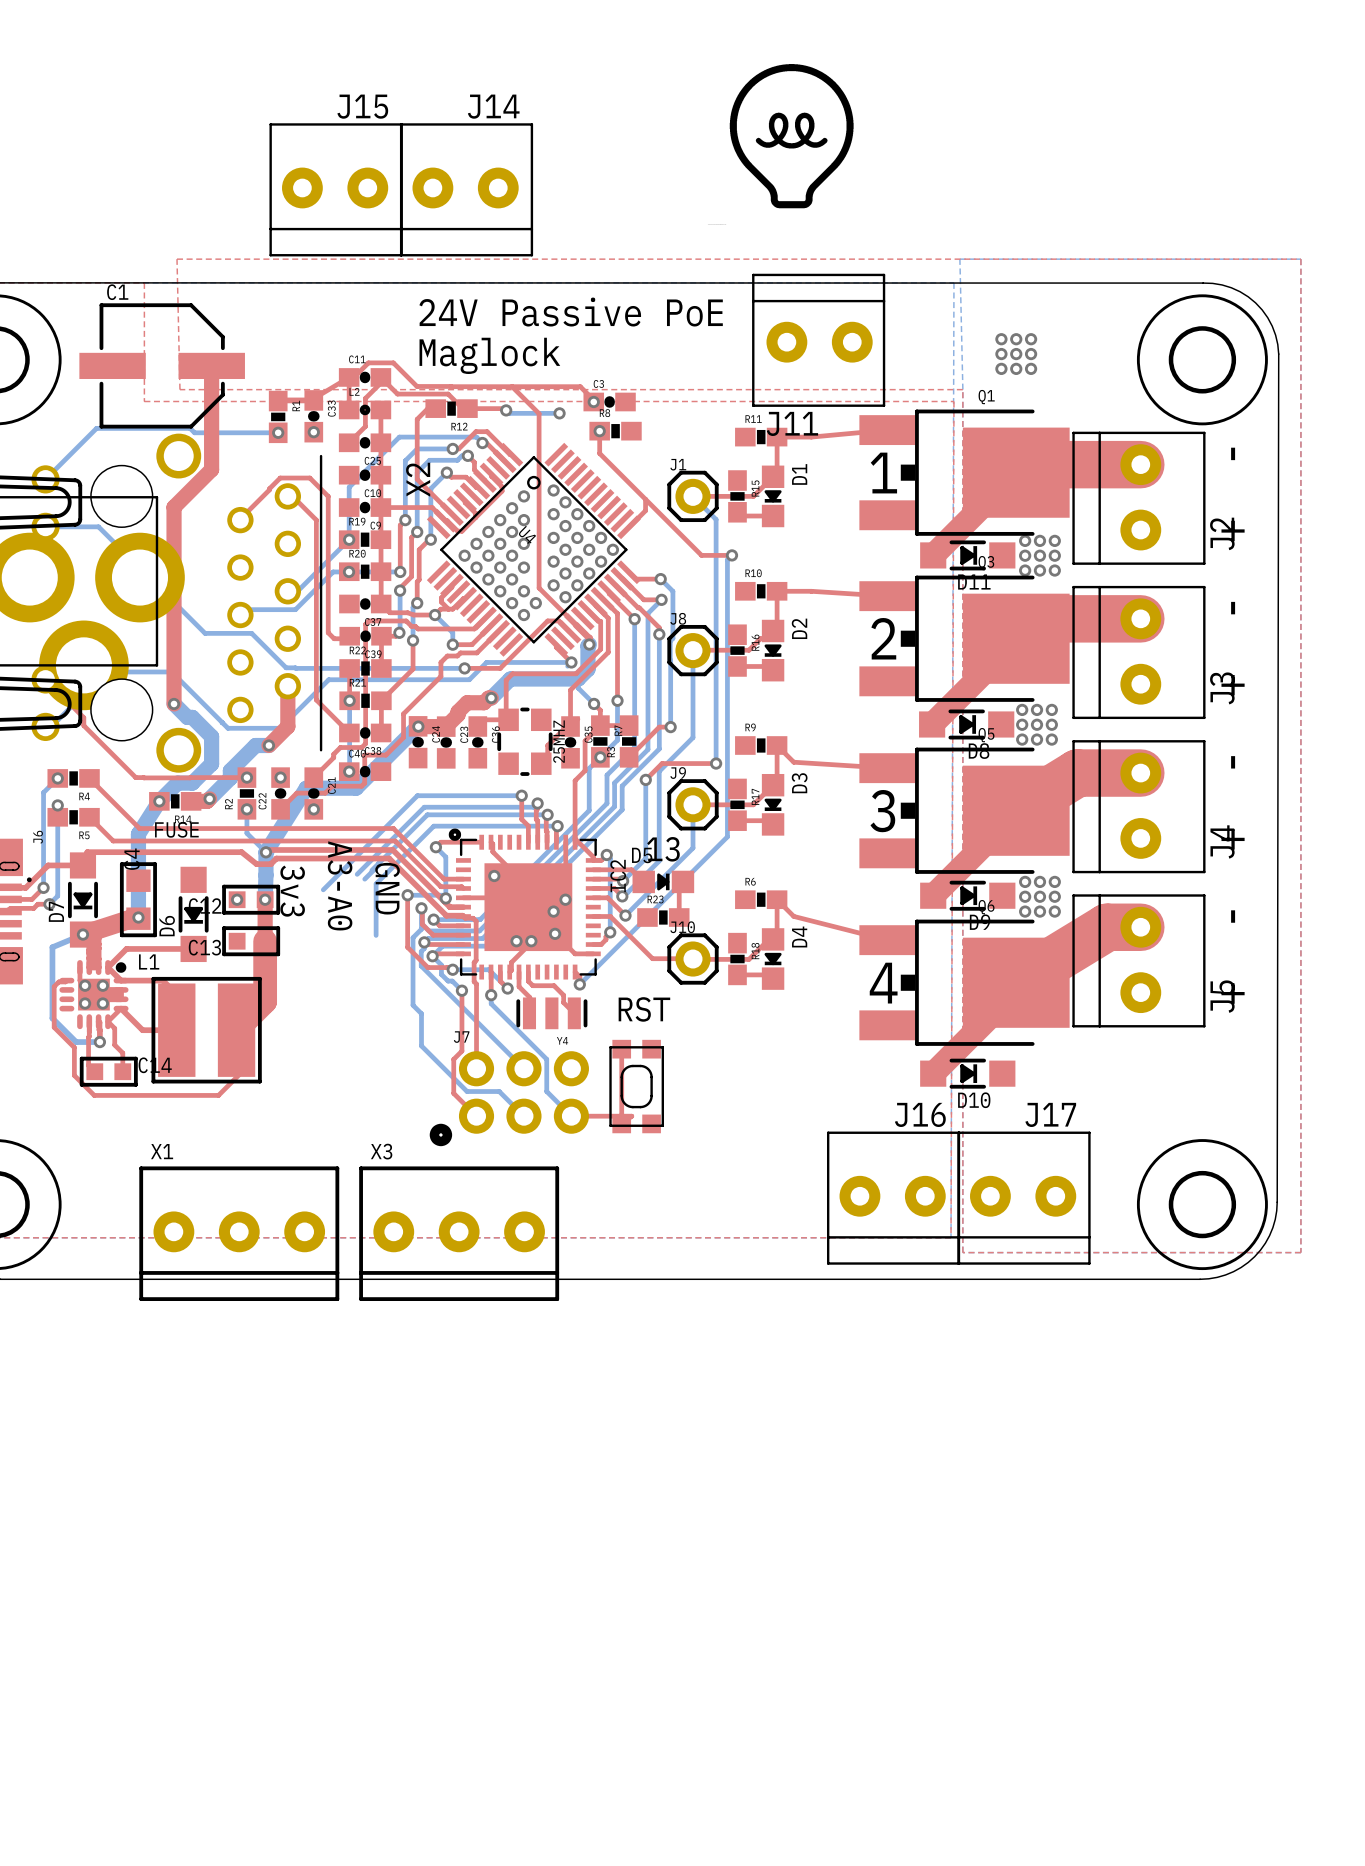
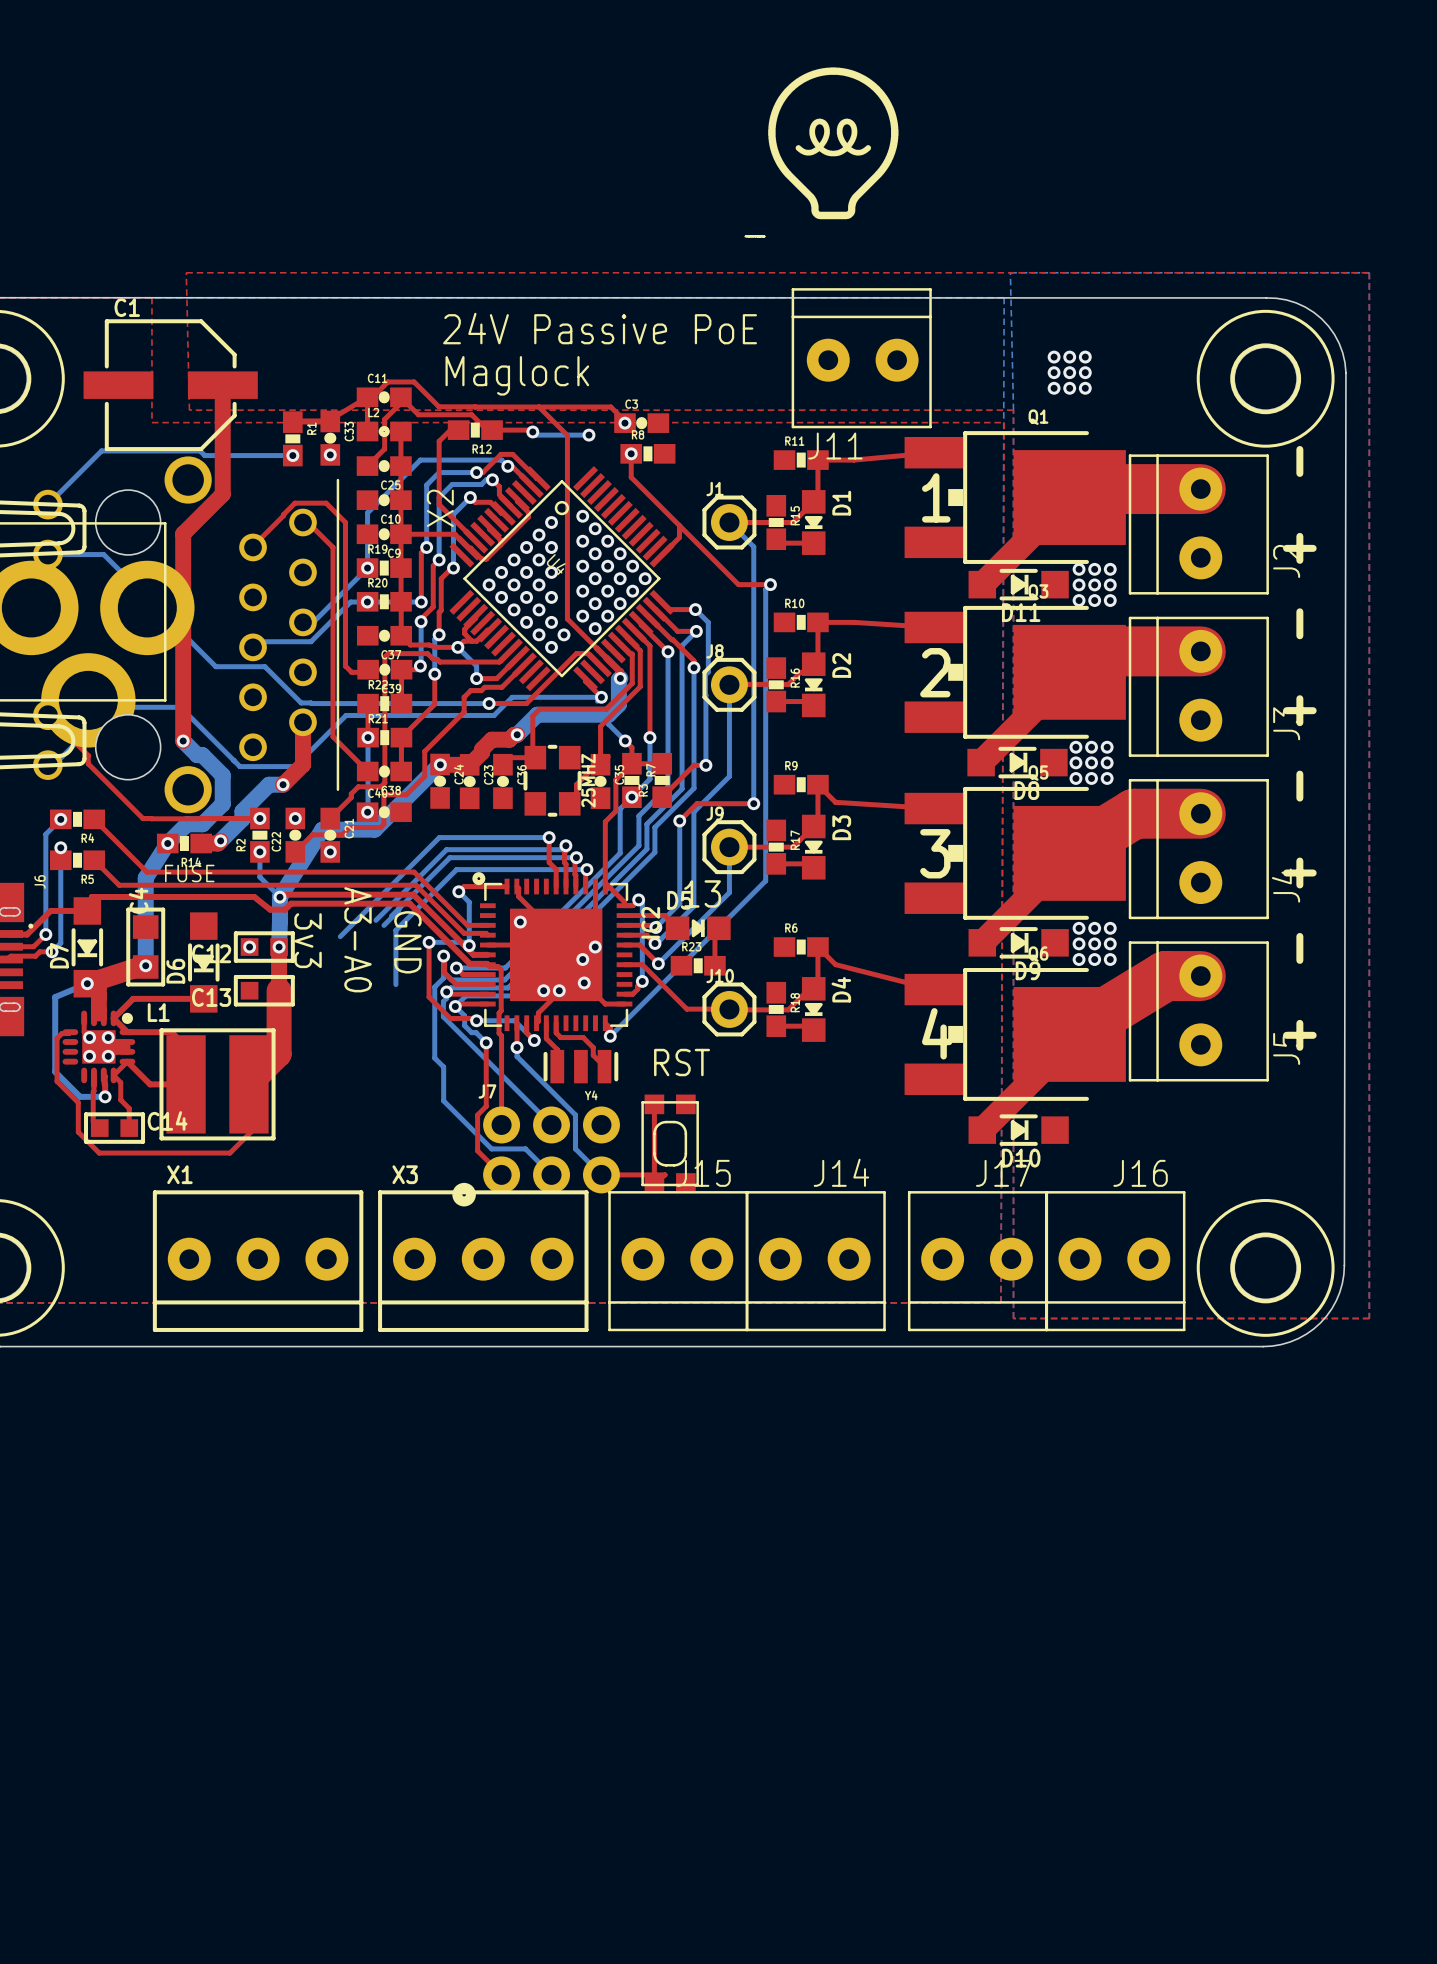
J15 position: (336, 189) -> (678, 1261)
J14 position: (466, 189) -> (815, 1261)
J16 position: (893, 1198) -> (1115, 1261)
J17 position: (1024, 1198) -> (978, 1261)
X1 position: (239, 1233) -> (258, 1261)
X3 position: (459, 1233) -> (483, 1261)

